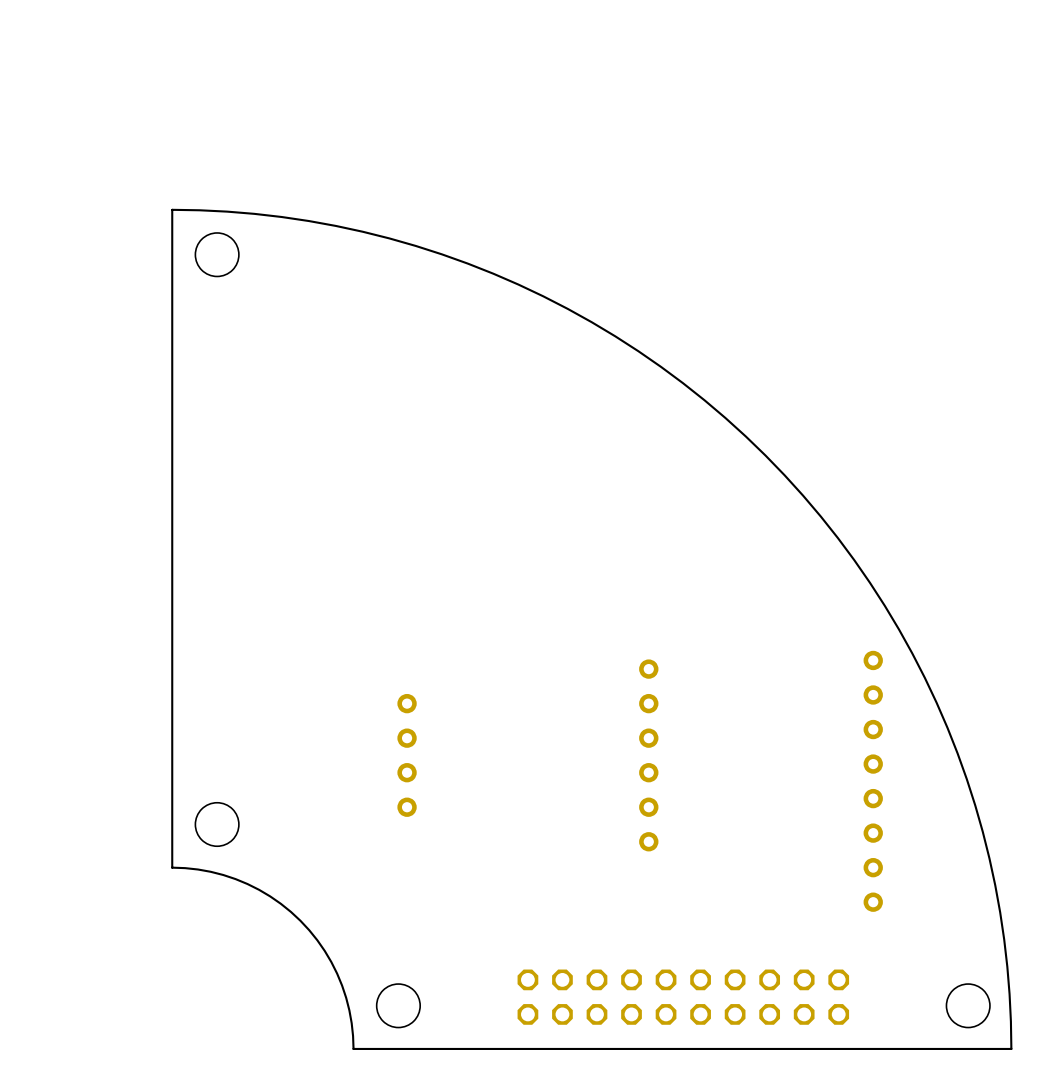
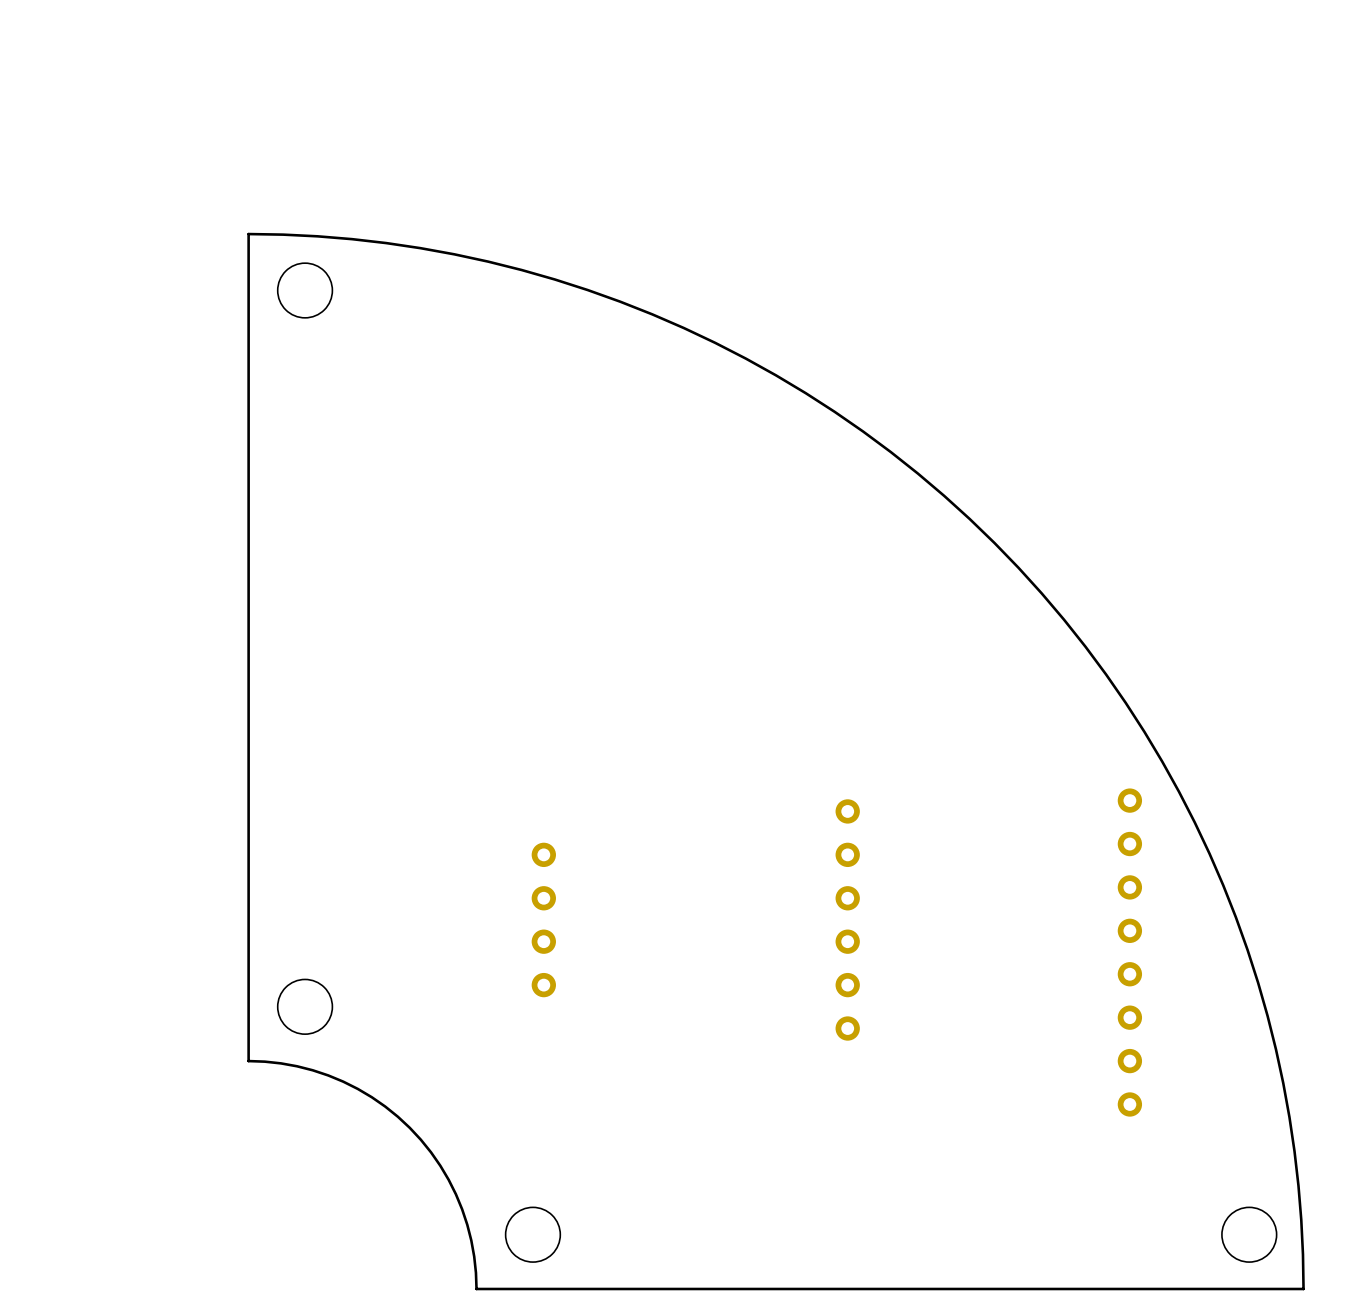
part: (683, 997) -> none

